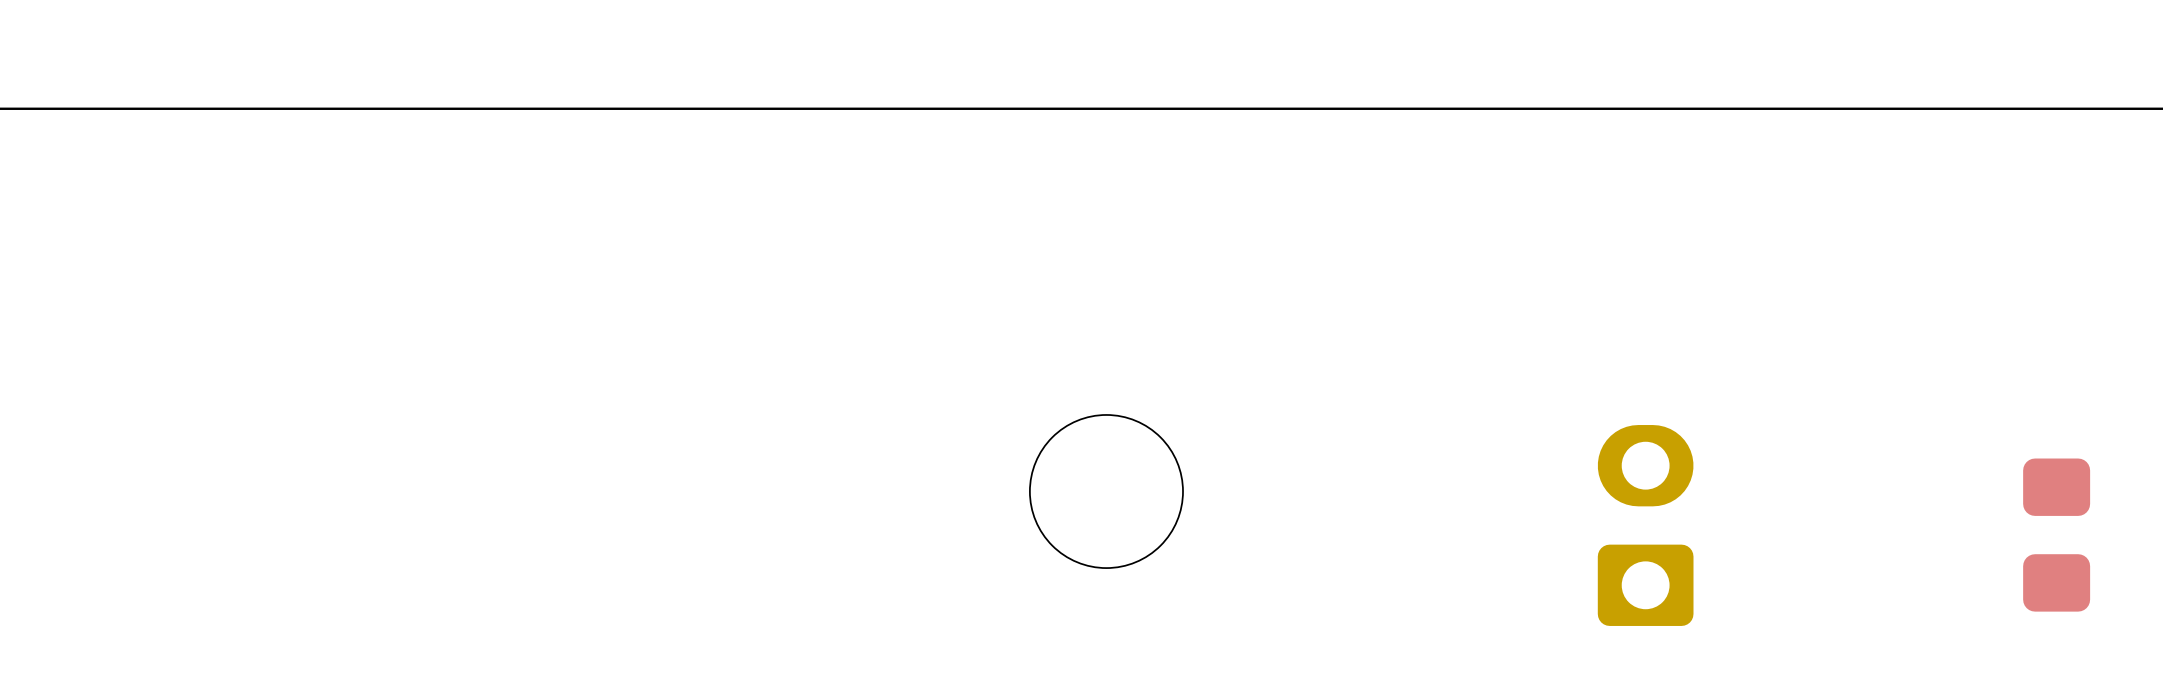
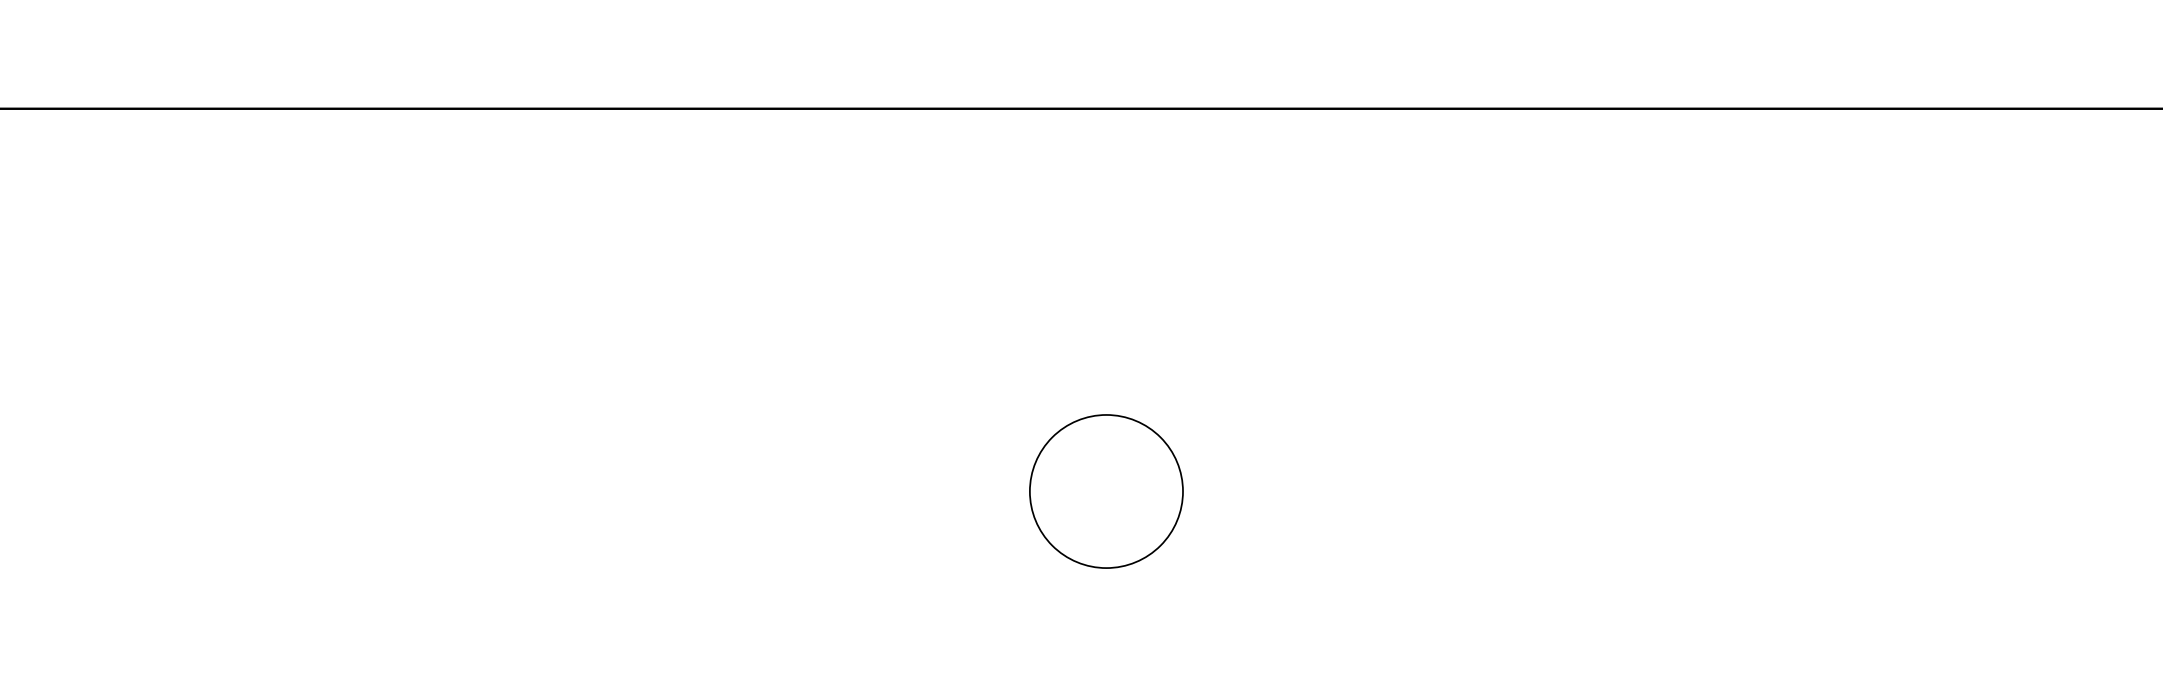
part: (1645, 525) -> none
part: (2056, 535) -> none

